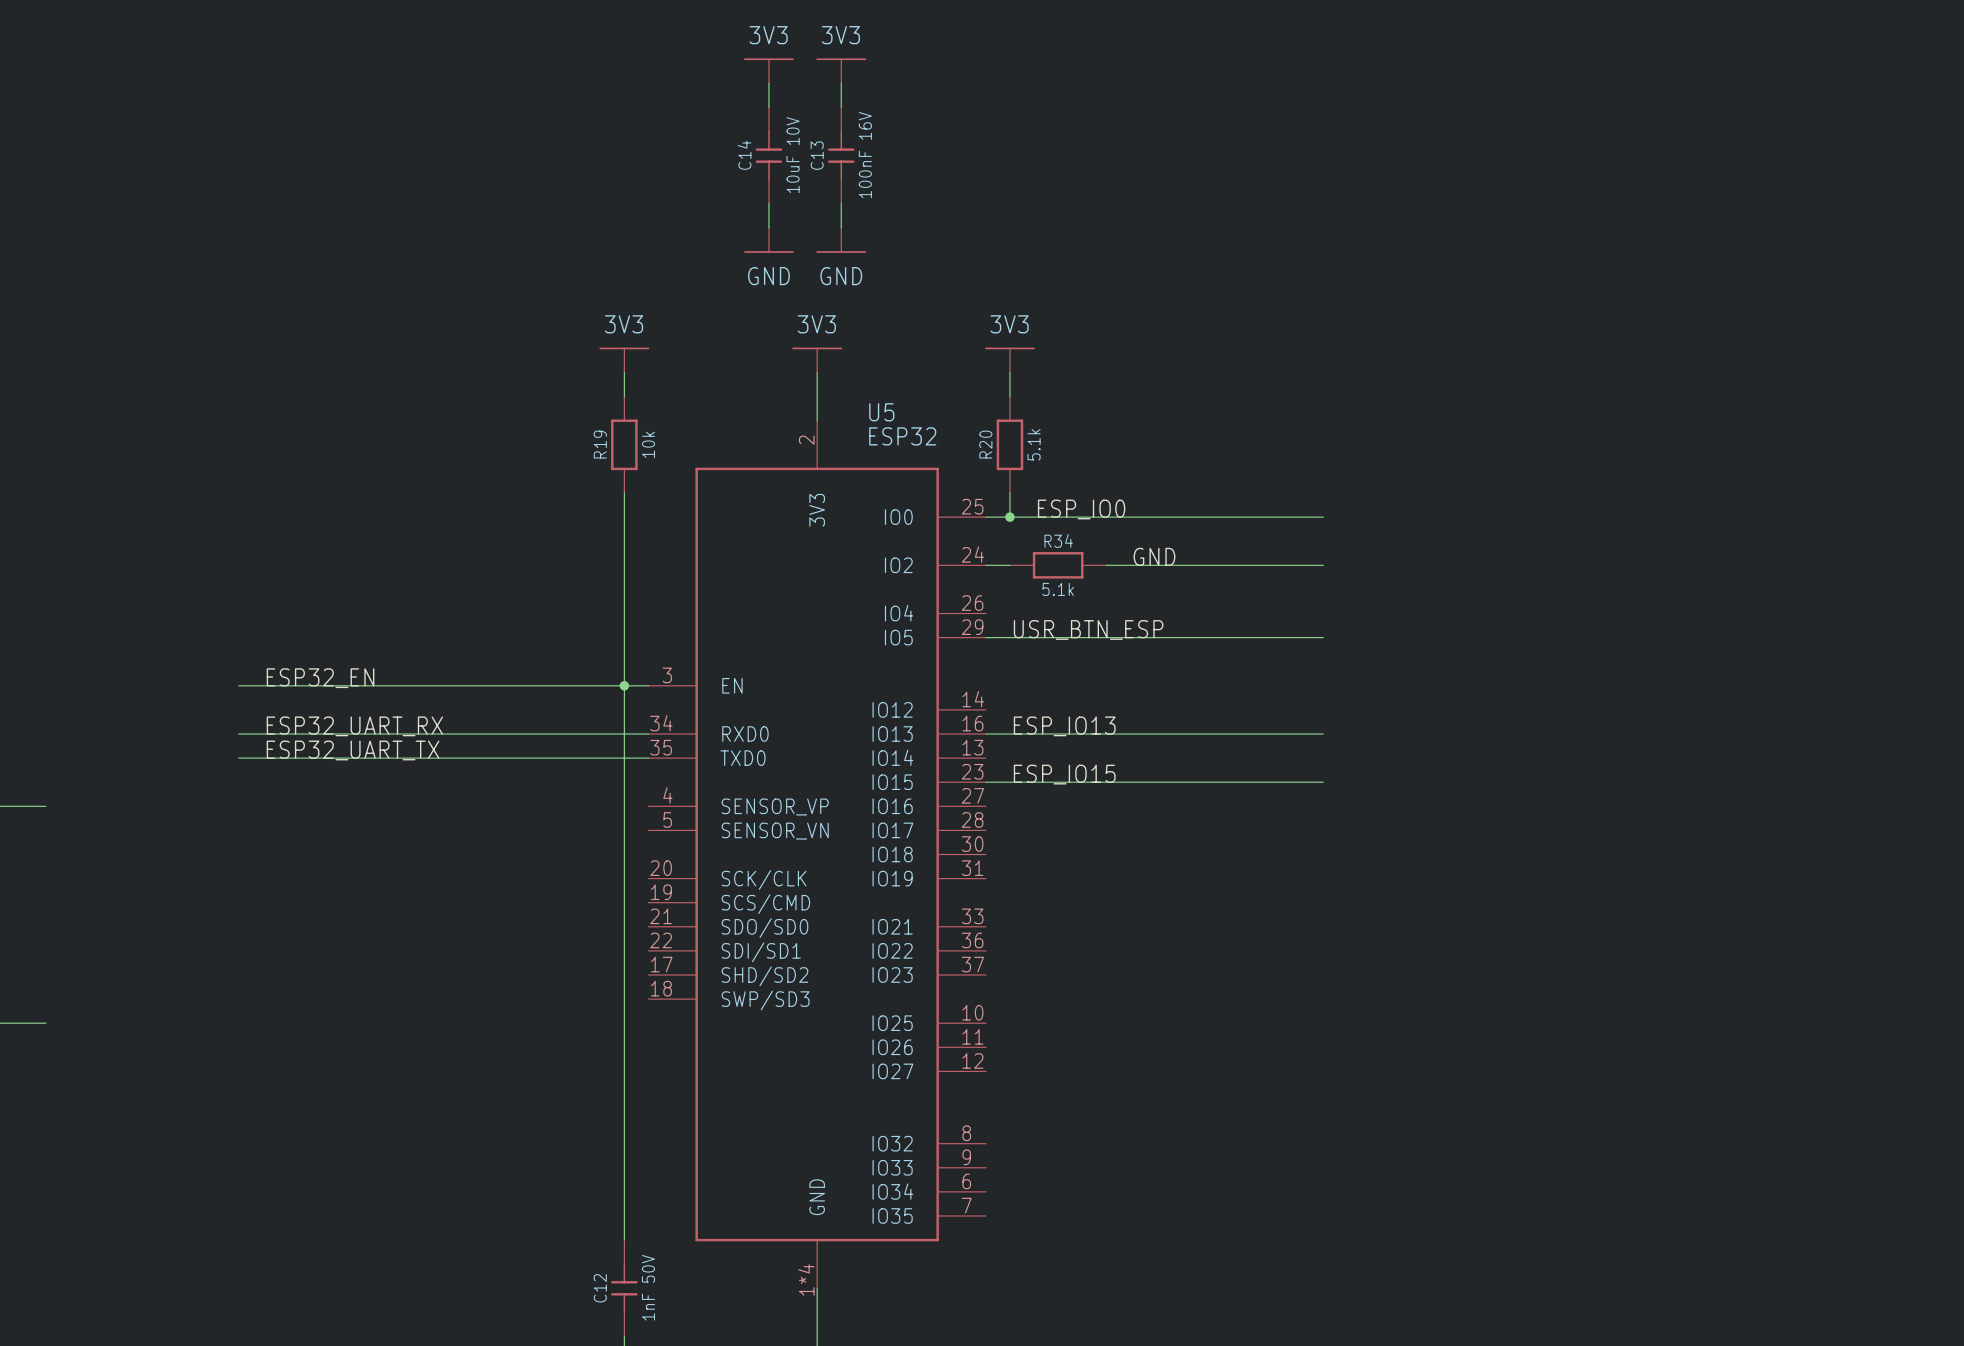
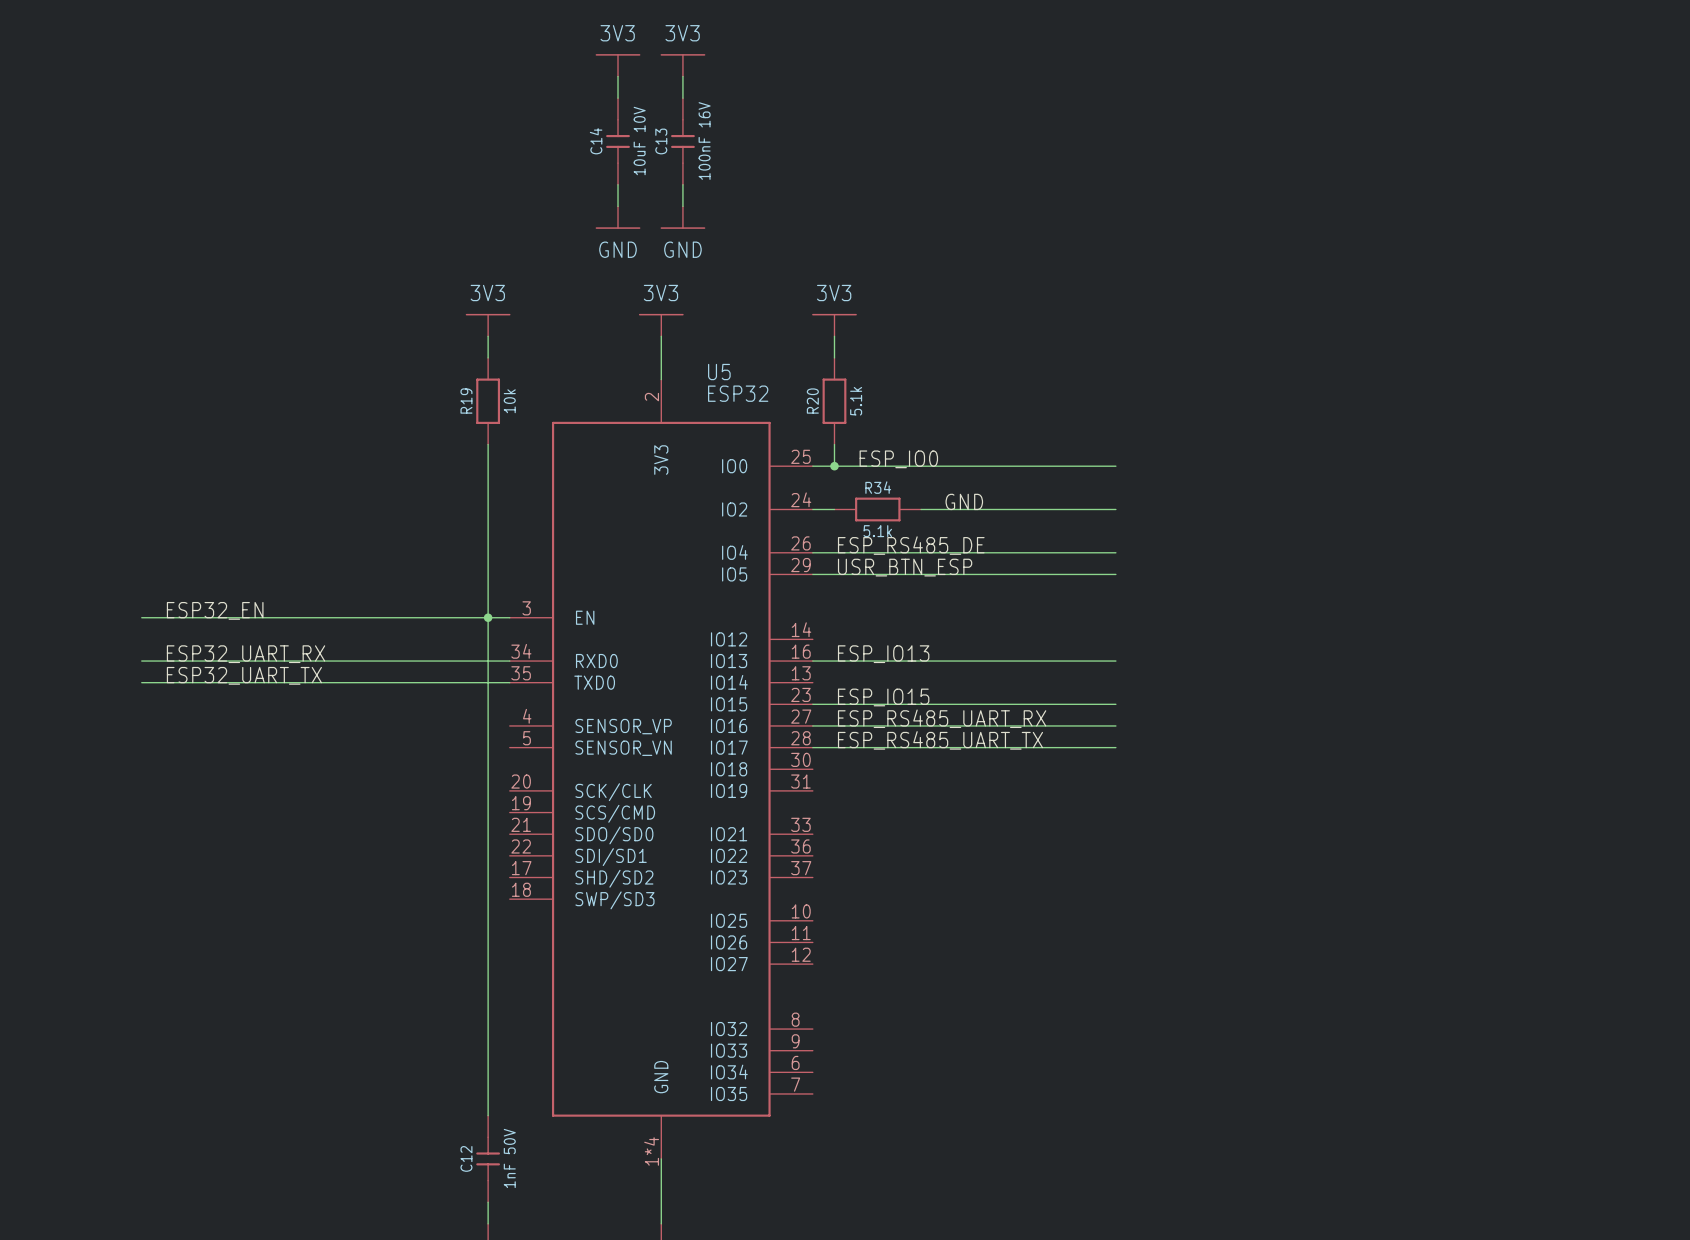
label: none -> ESP_RS485_DE (911, 545)
wire: none -> (812, 552) (1115, 552)
label: none -> ESP_RS485_UART_RX (942, 718)
wire: none -> (812, 725) (1115, 725)
label: none -> ESP_RS485_UART_TX (940, 740)
wire: none -> (812, 747) (1115, 747)

